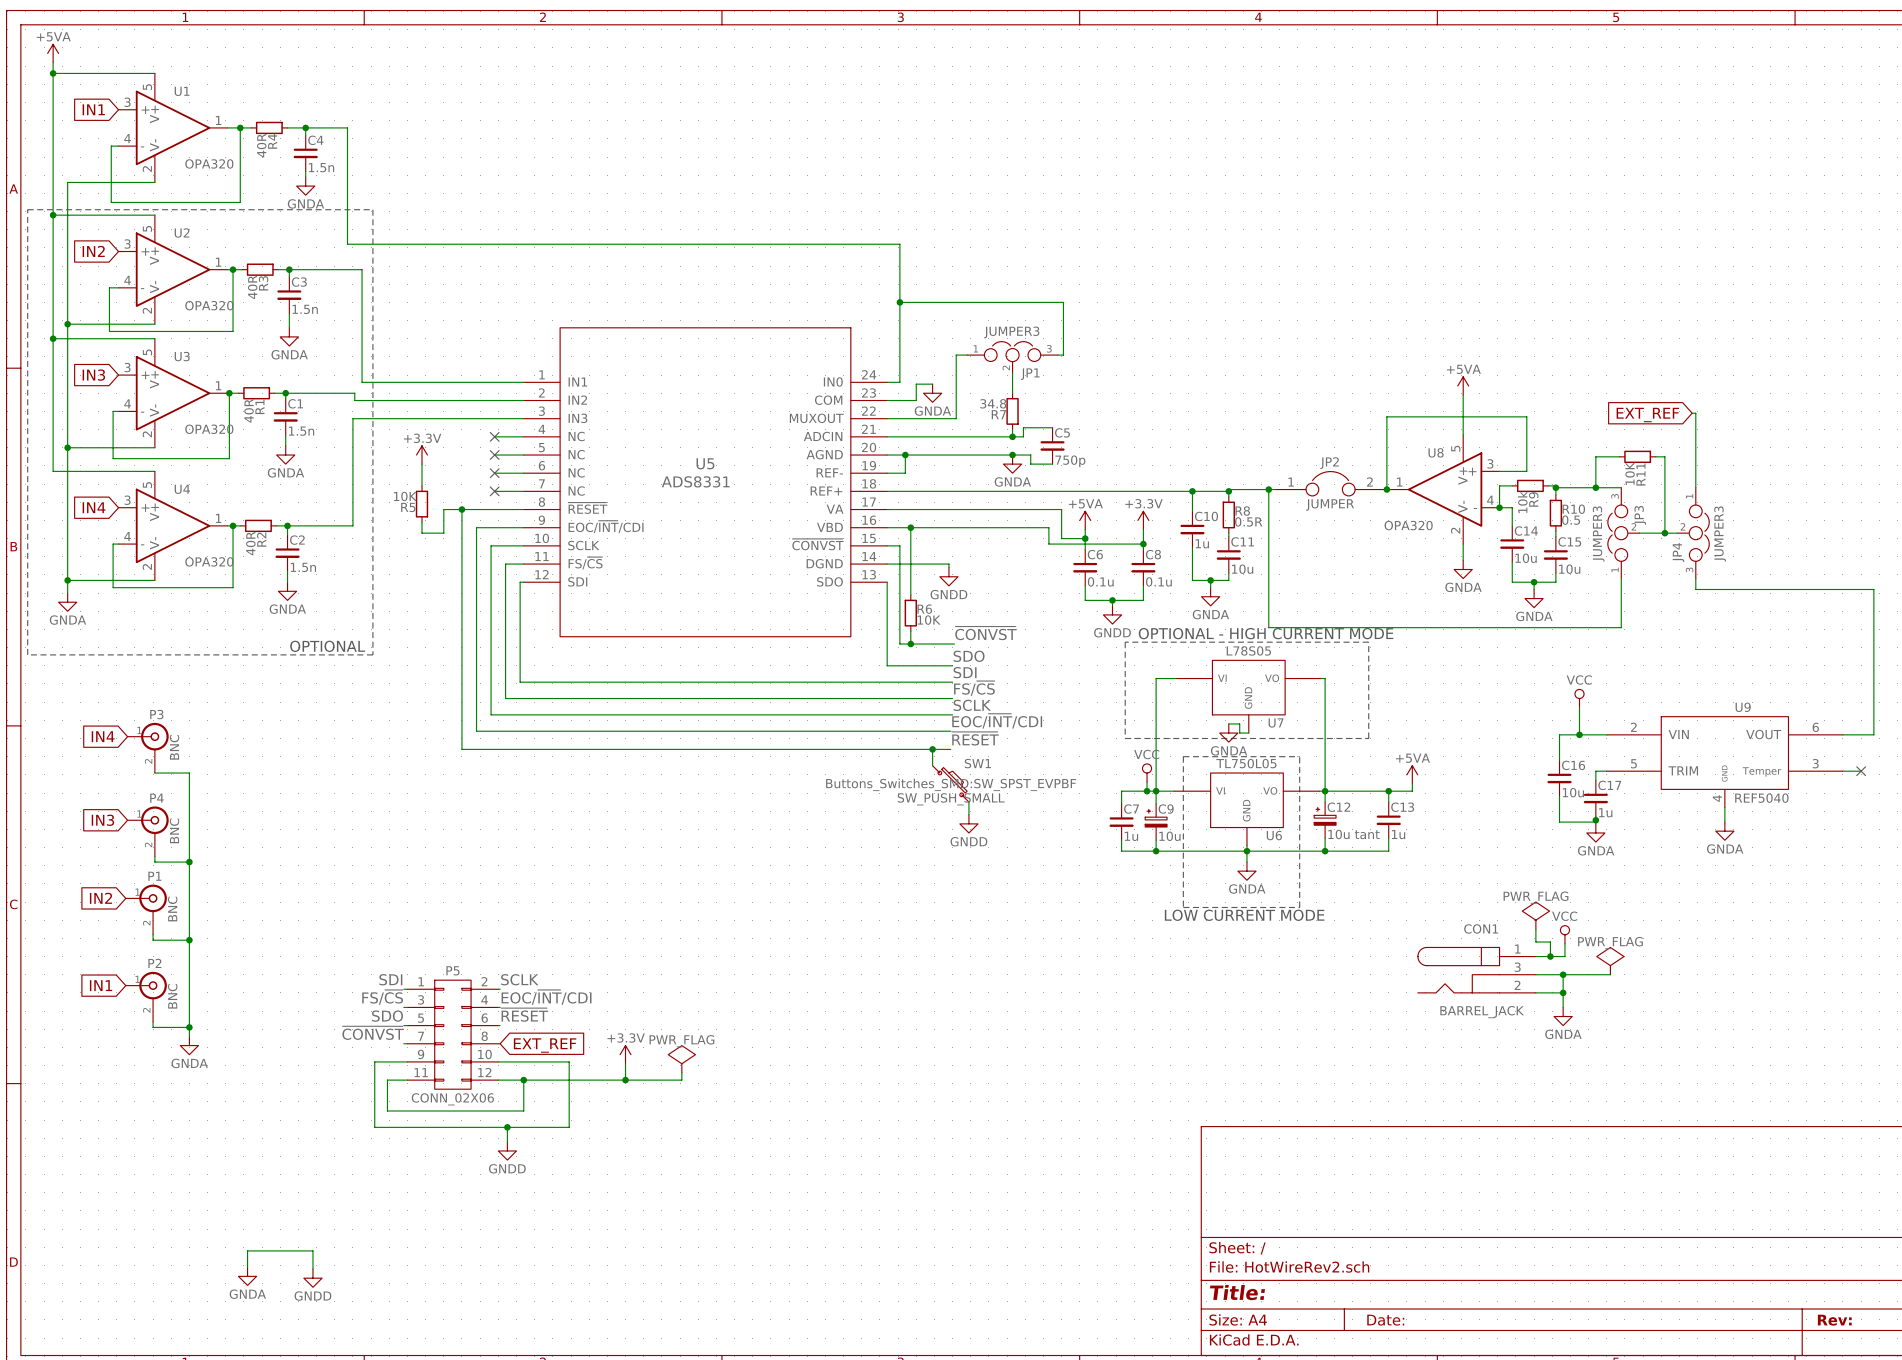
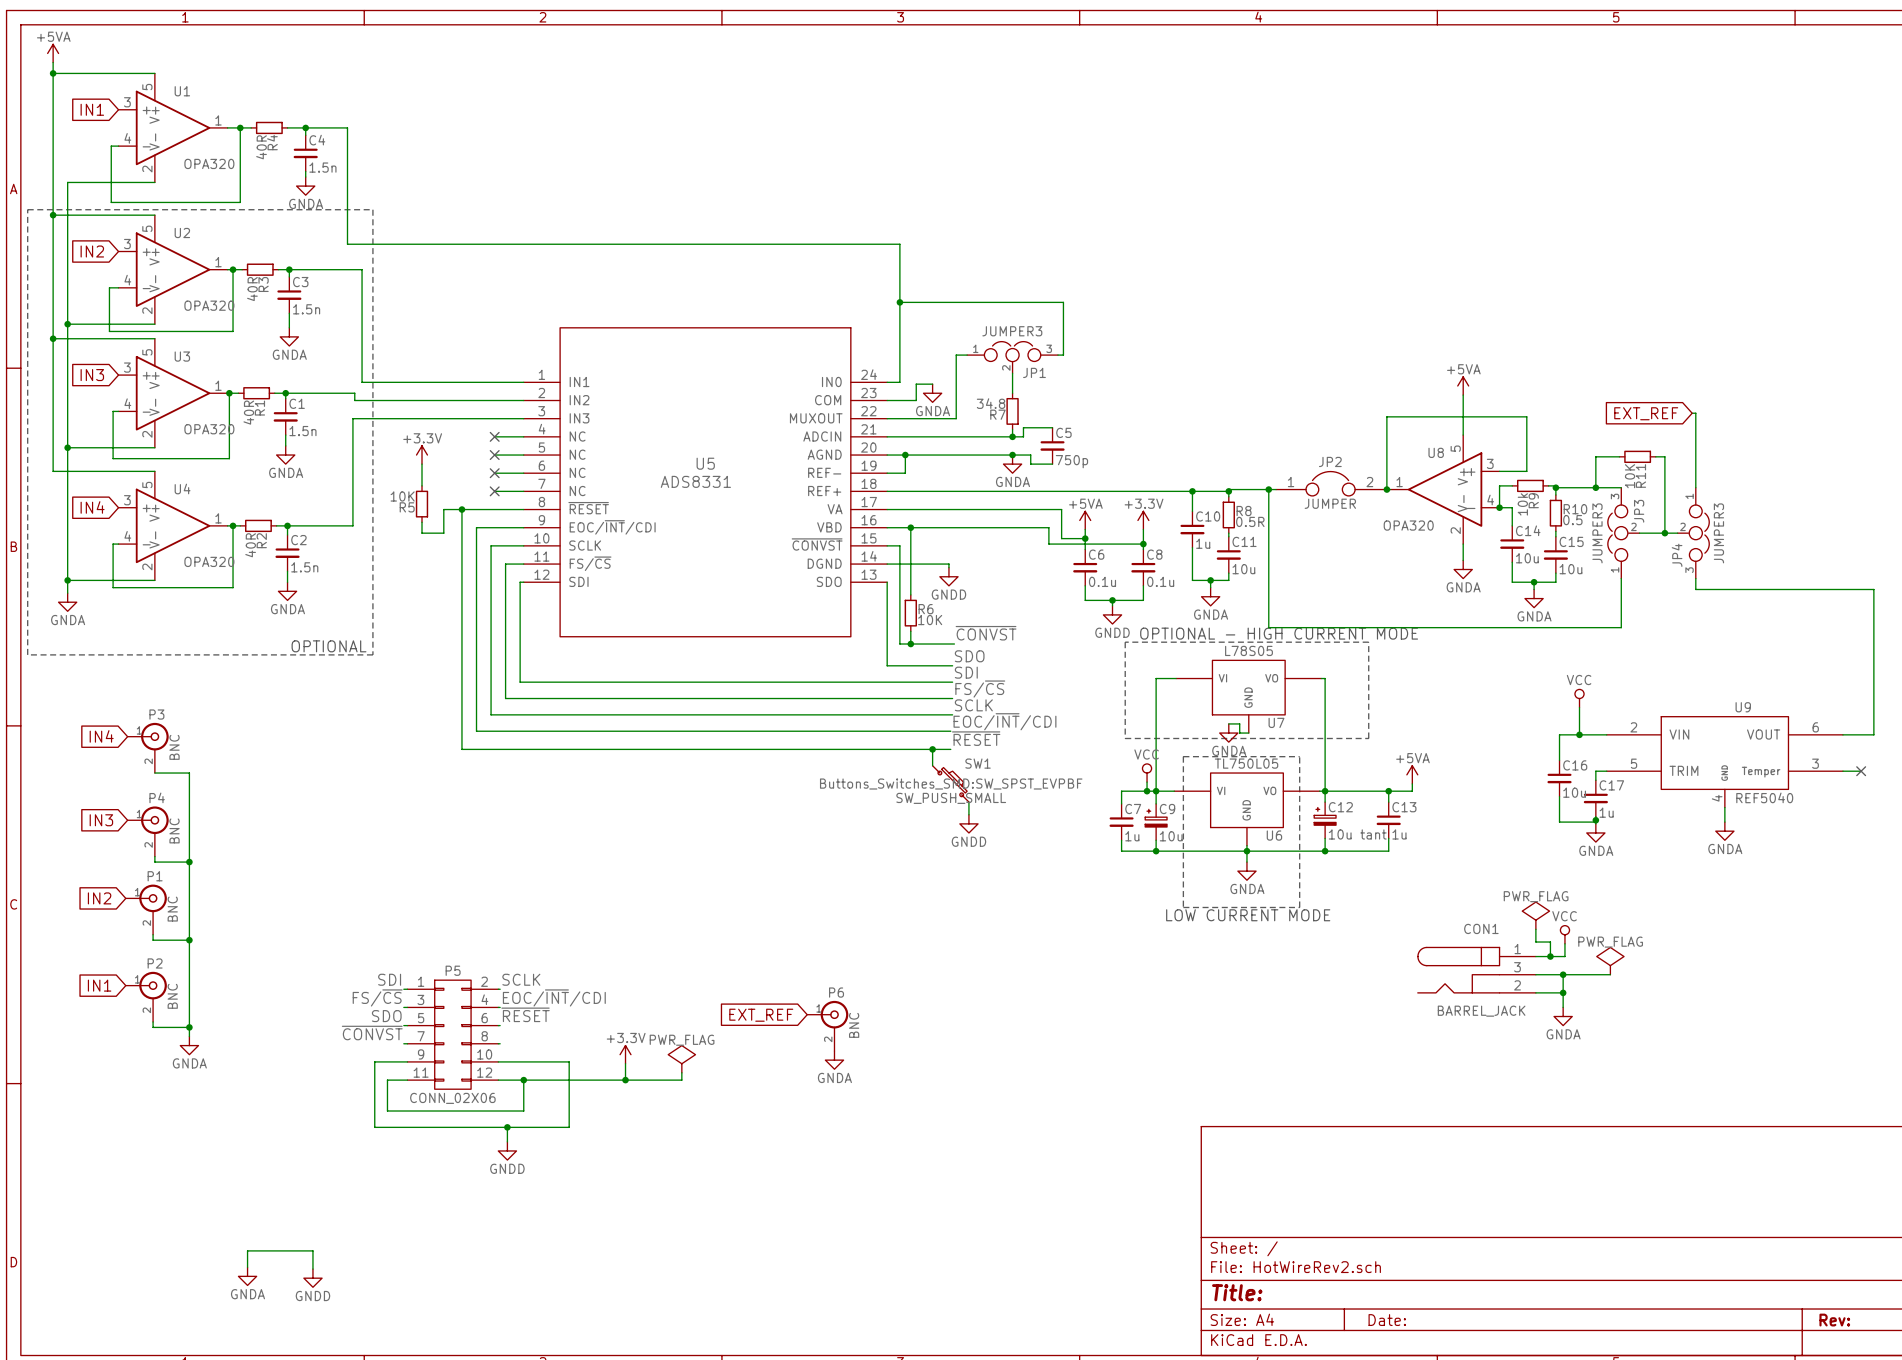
global label: none -> EXT_REF (761, 1015)
P6: none -> BNC (827, 1025)
global label: EXT_REF (545, 1045) -> none
power symbol: none -> GNDA (834, 1060)

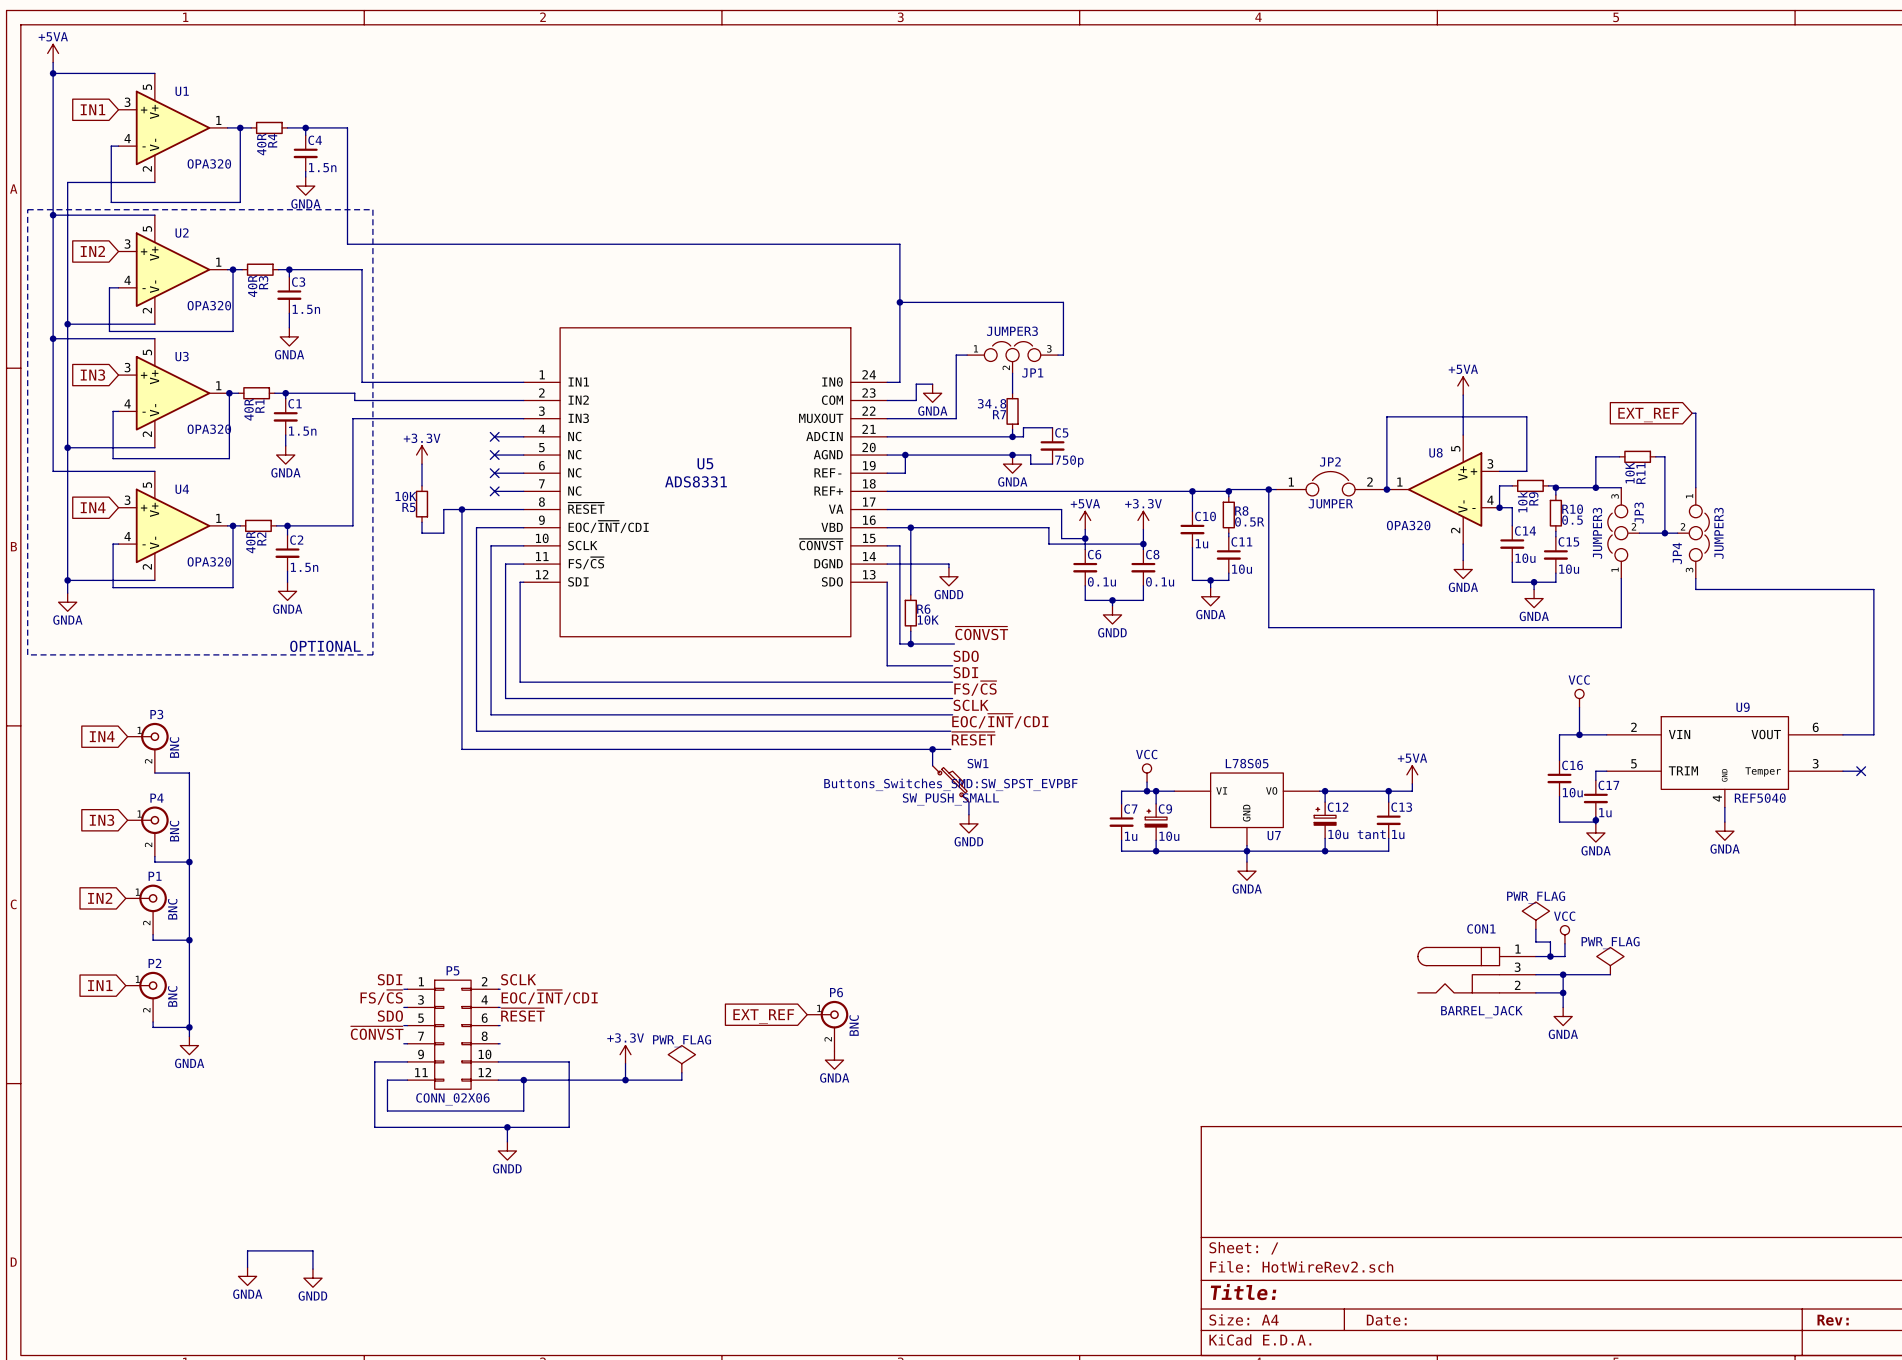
text: OPTIONAL - HIGH CURRENT MODE (1279, 633) -> none
line: (1125, 642) (1368, 642) (1368, 738) (1125, 738) (1125, 642) -> none
wire: (1176, 678) (1156, 678) (1156, 791) -> none
wire: (1321, 678) (1325, 678) (1325, 791) -> none
U7: L78S05 (1248, 696) -> none
wire: (1228, 723) (1239, 723) (1239, 733) (1248, 733) -> none
power symbol: GNDA (1228, 733) -> none
line: (1183, 756) (1299, 756) (1299, 907) (1183, 907) (1183, 756) -> none
U6 value: TL750L05 (1246, 763) -> L78S05 (1247, 763)
U6 name: U6 (1274, 835) -> U7 (1274, 835)
text: LOW CURRENT MODE (1248, 915) -> none

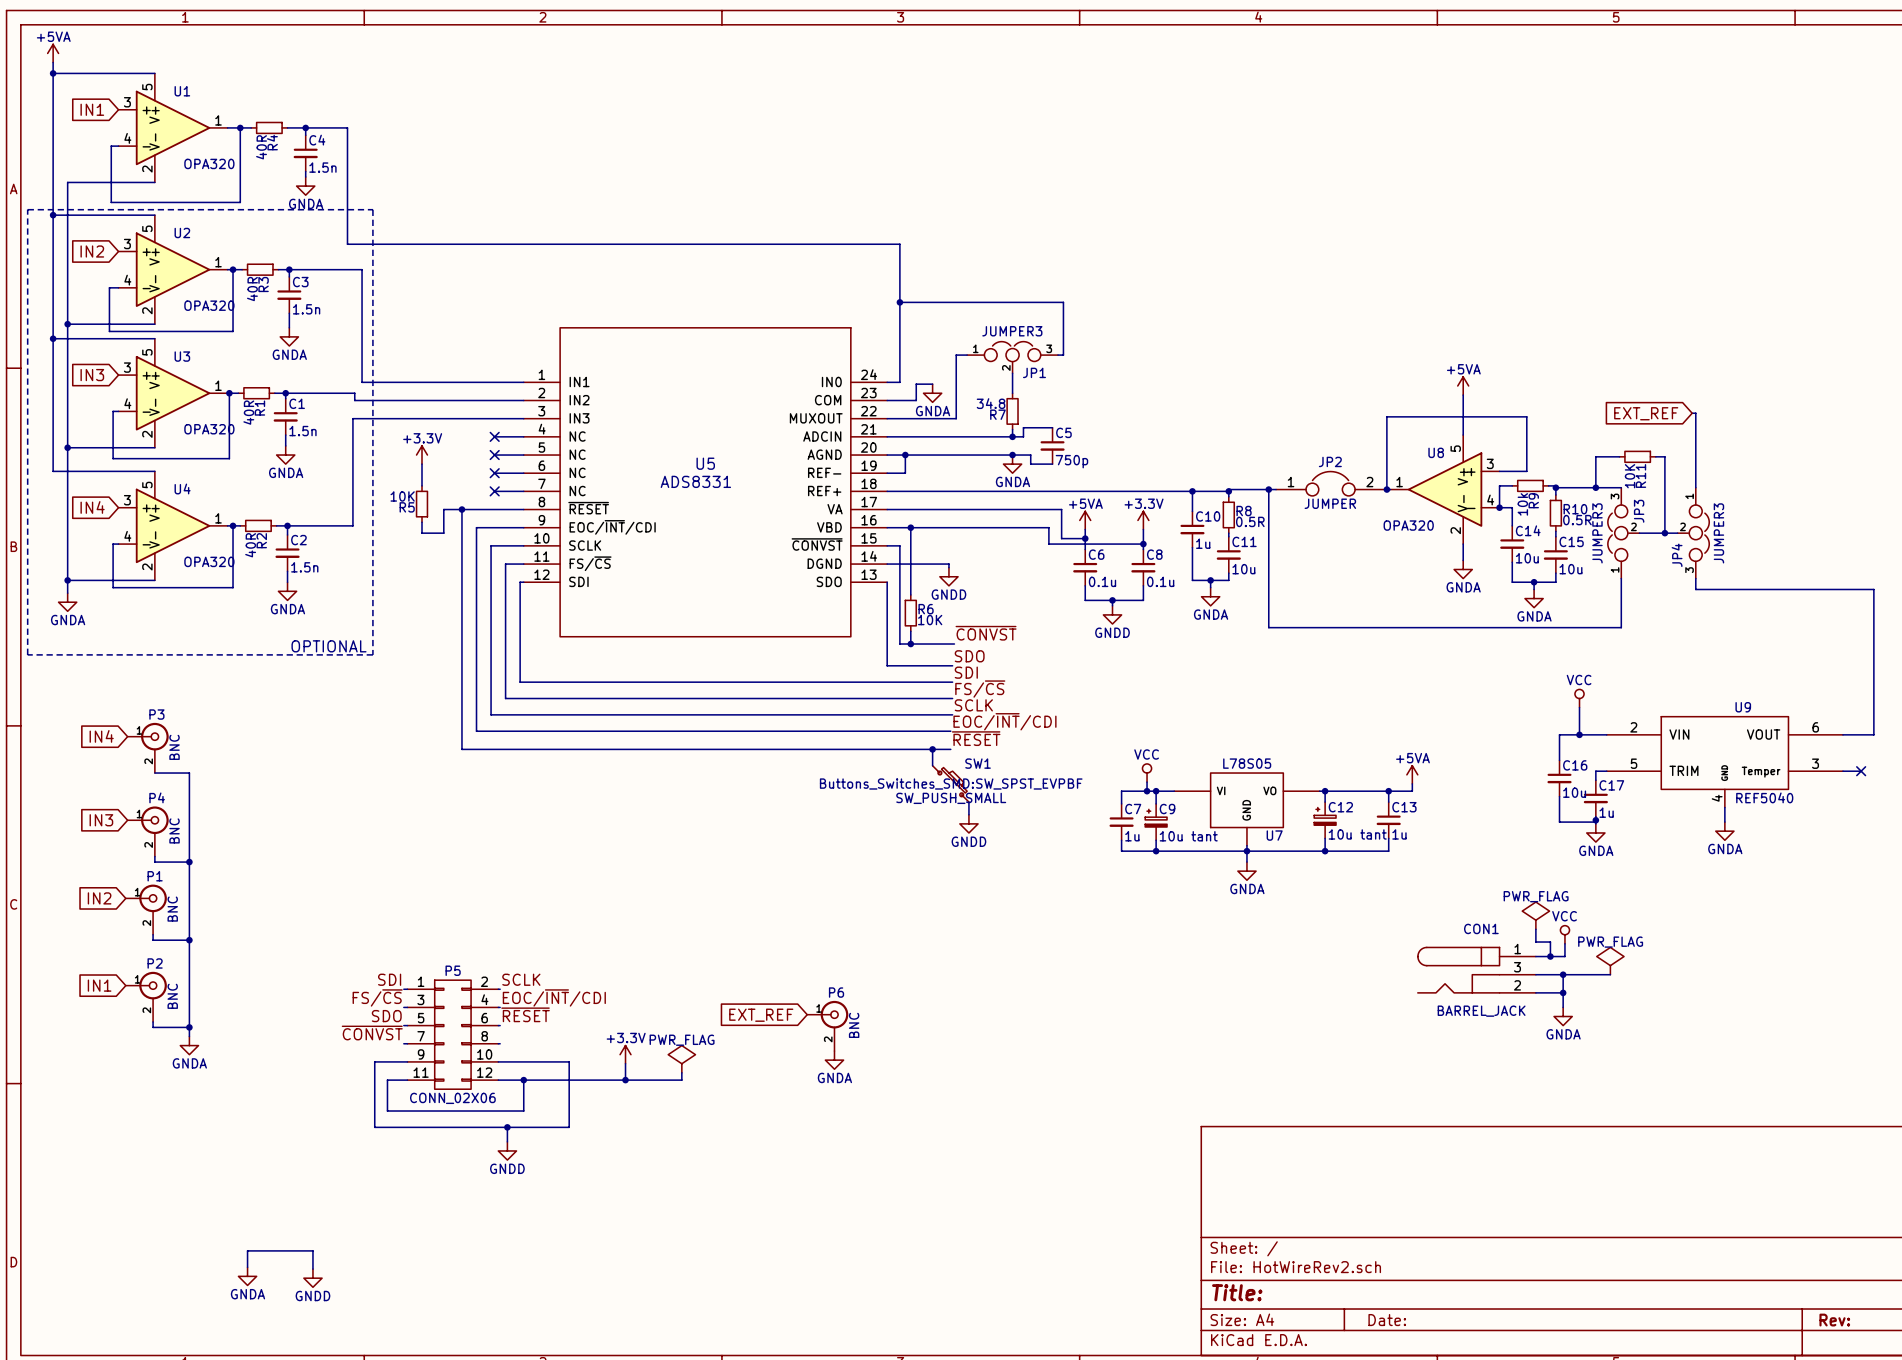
R10 value: 0.5 (1572, 520) -> 0.5R (1577, 520)
C9 value: 10u (1169, 836) -> 10u tant (1188, 836)

